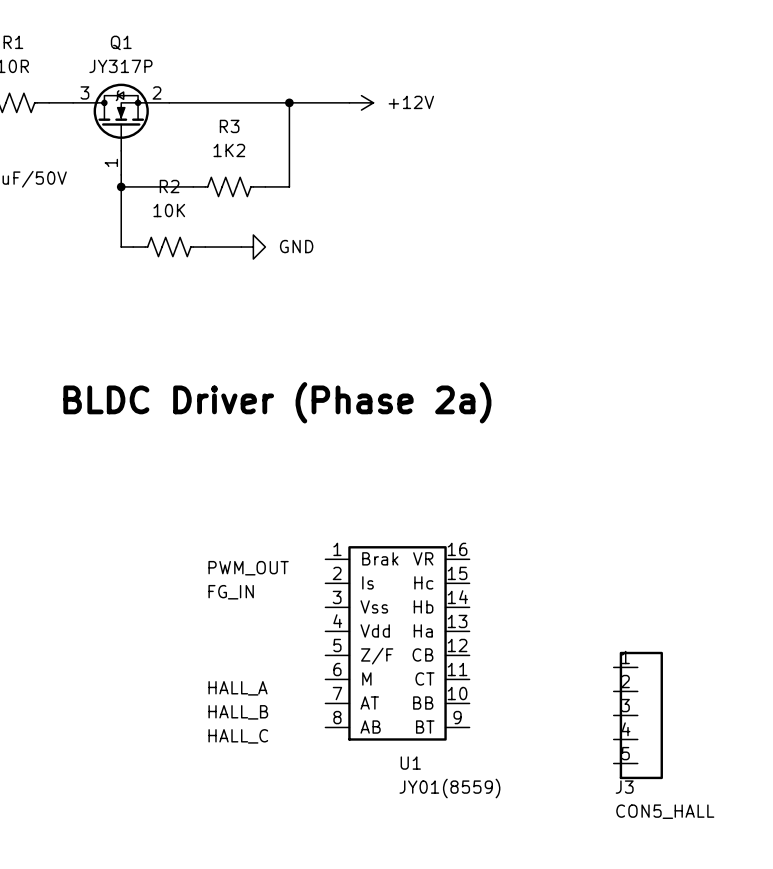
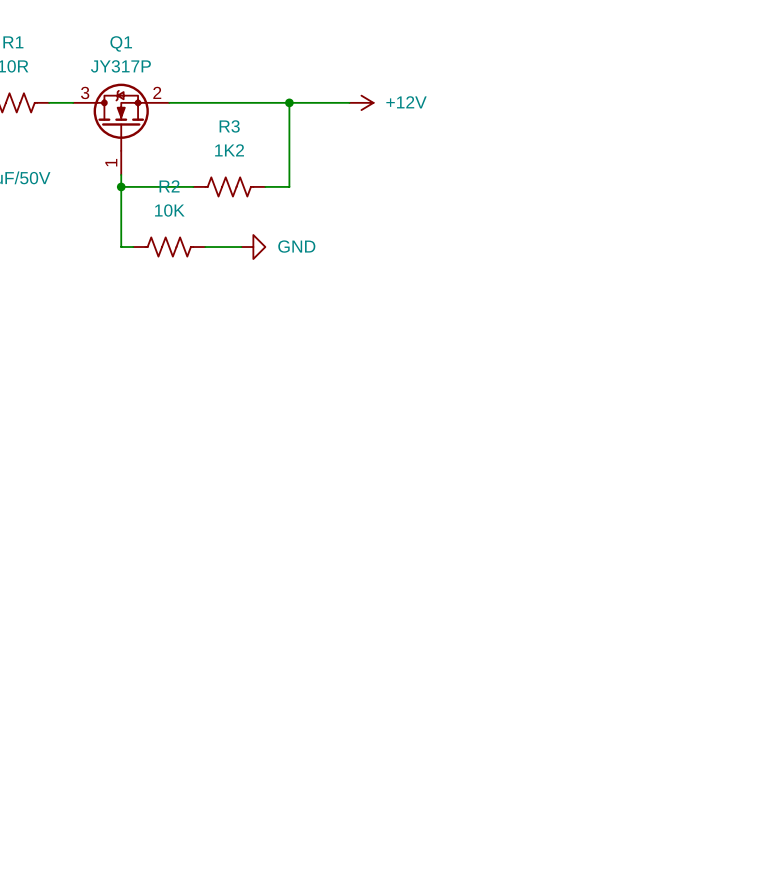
text: BLDC Driver (Phase 2a) (277, 402) -> none
label: PWM_OUT (248, 568) -> none
label: FG_IN (231, 592) -> none
U1: JY01(8559) (397, 643) -> none
label: HALL_A (238, 688) -> none
label: HALL_B (238, 712) -> none
J3: CON5_HALL (638, 715) -> none
label: HALL_C (238, 736) -> none

